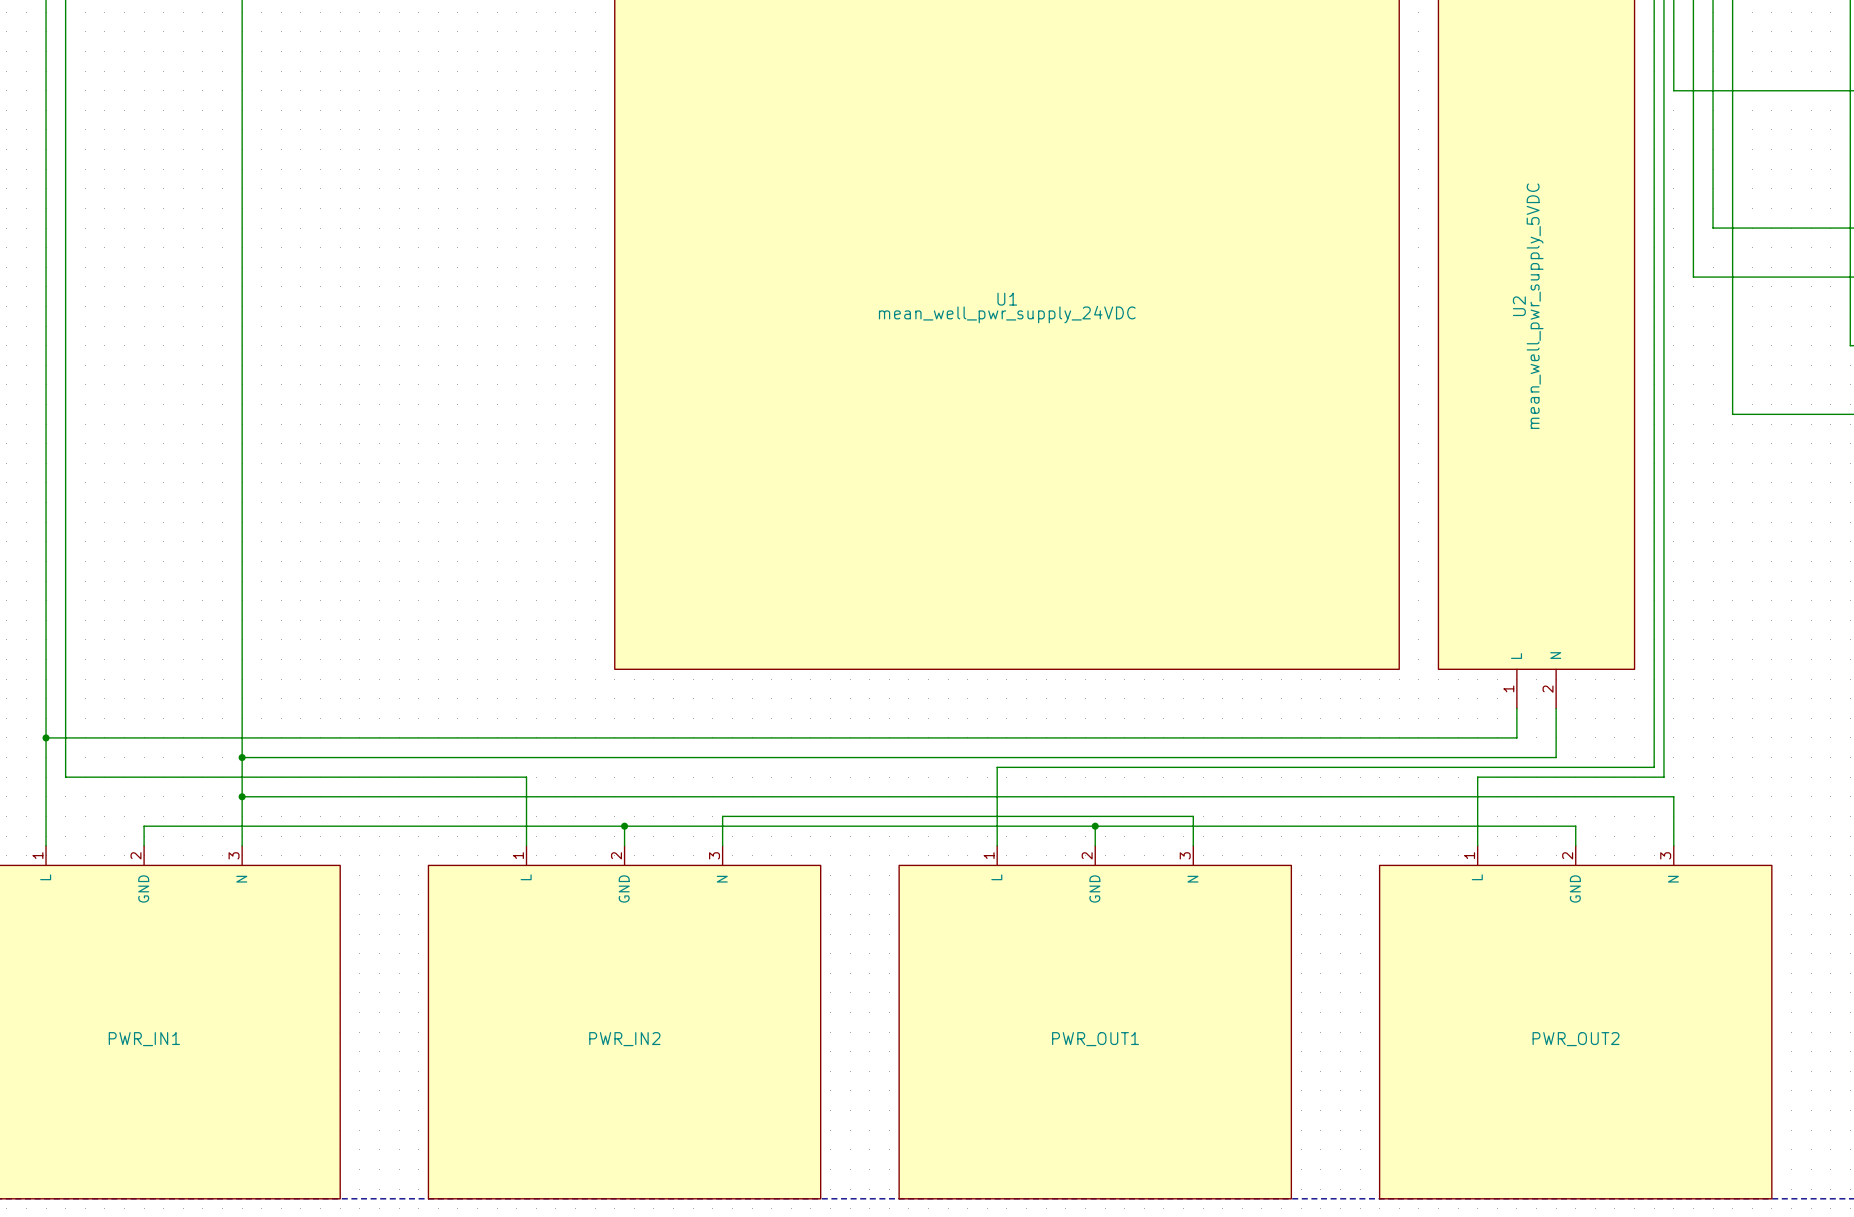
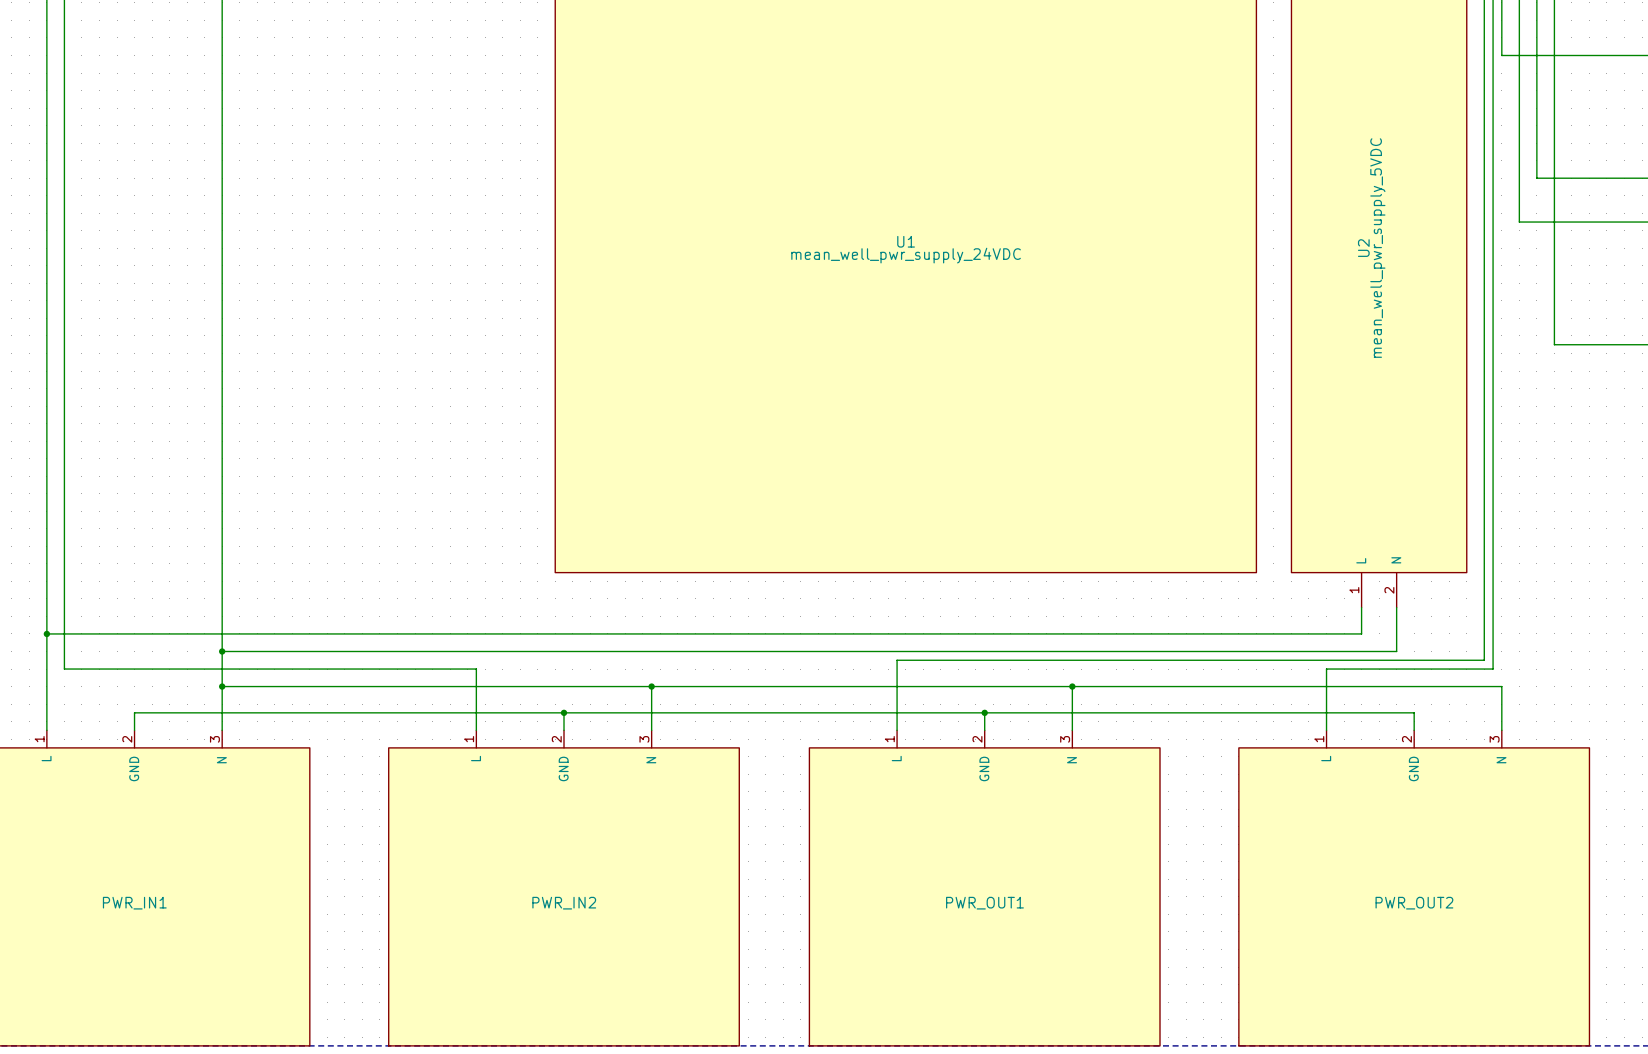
junction: none -> (651, 686)
wire: none -> (1072, 686) (1072, 704)
junction: none -> (1072, 686)
wire: (722, 816) (1193, 816) -> (651, 704) (651, 686)

